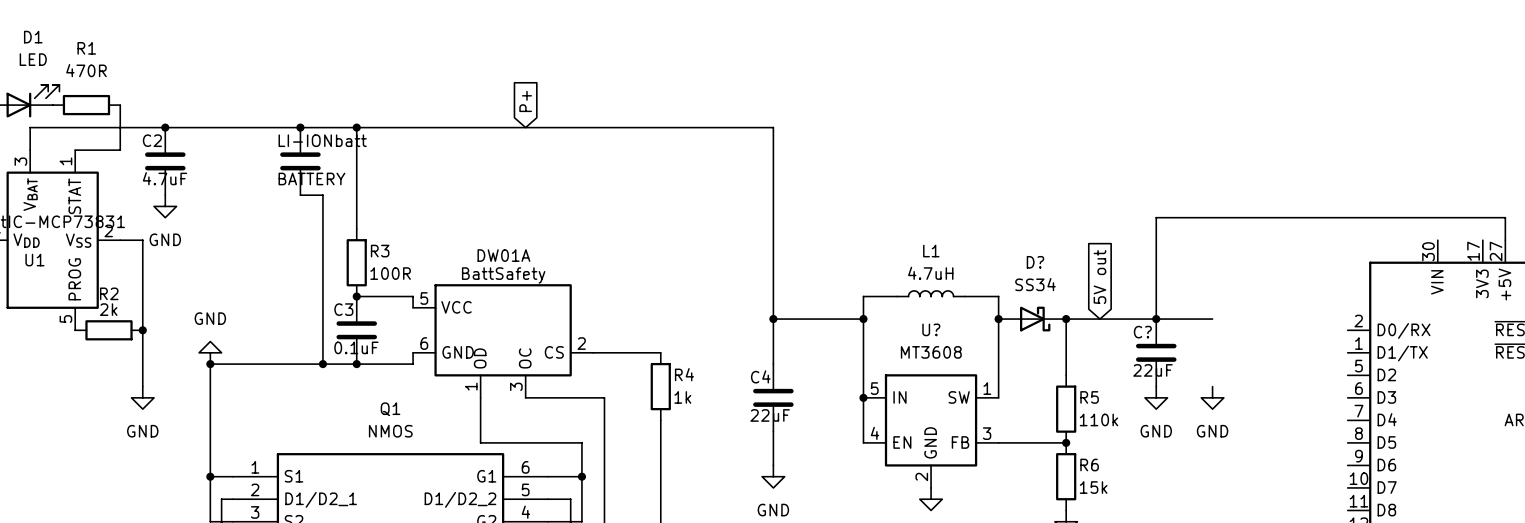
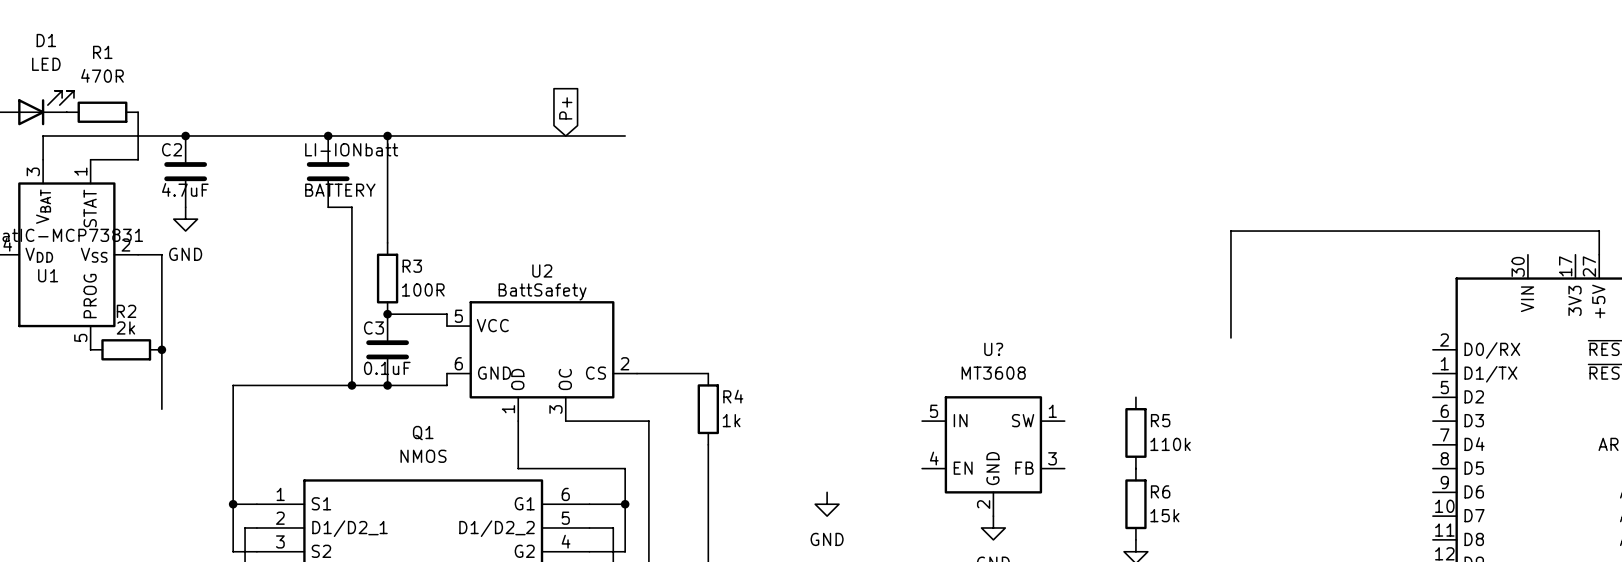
wire: (581, 127) (773, 127) (773, 364) -> none
DW01A name: DW01A (503, 255) -> U2 (542, 270)
global label: 5V out (1099, 277) -> none
L1: 4.7uH (931, 293) -> none
wire: (897, 296) (863, 296) (863, 442) -> none
wire: (964, 296) (998, 296) (998, 397) -> none
wire: (773, 319) (863, 319) -> none
junction: (773, 319) -> none
junction: (863, 319) -> none
junction: (998, 319) -> none
D?: SS34 (1032, 319) -> none
junction: (1066, 319) -> none
junction: (1156, 319) -> none
wire: (1212, 319) (1066, 319) (1066, 375) -> none
power symbol: GND (210, 352) -> none
C?: 22uF (1156, 352) -> none
junction: (210, 364) -> none
power symbol: GND (142, 397) -> none
C4: 22uF (773, 397) -> none
junction: (863, 397) -> none
power symbol: GND (1156, 397) -> none
power symbol: GND (1212, 397) -> none
wire: (773, 431) (773, 465) -> none
wire: (998, 442) (1066, 442) -> none
junction: (1066, 442) -> none

